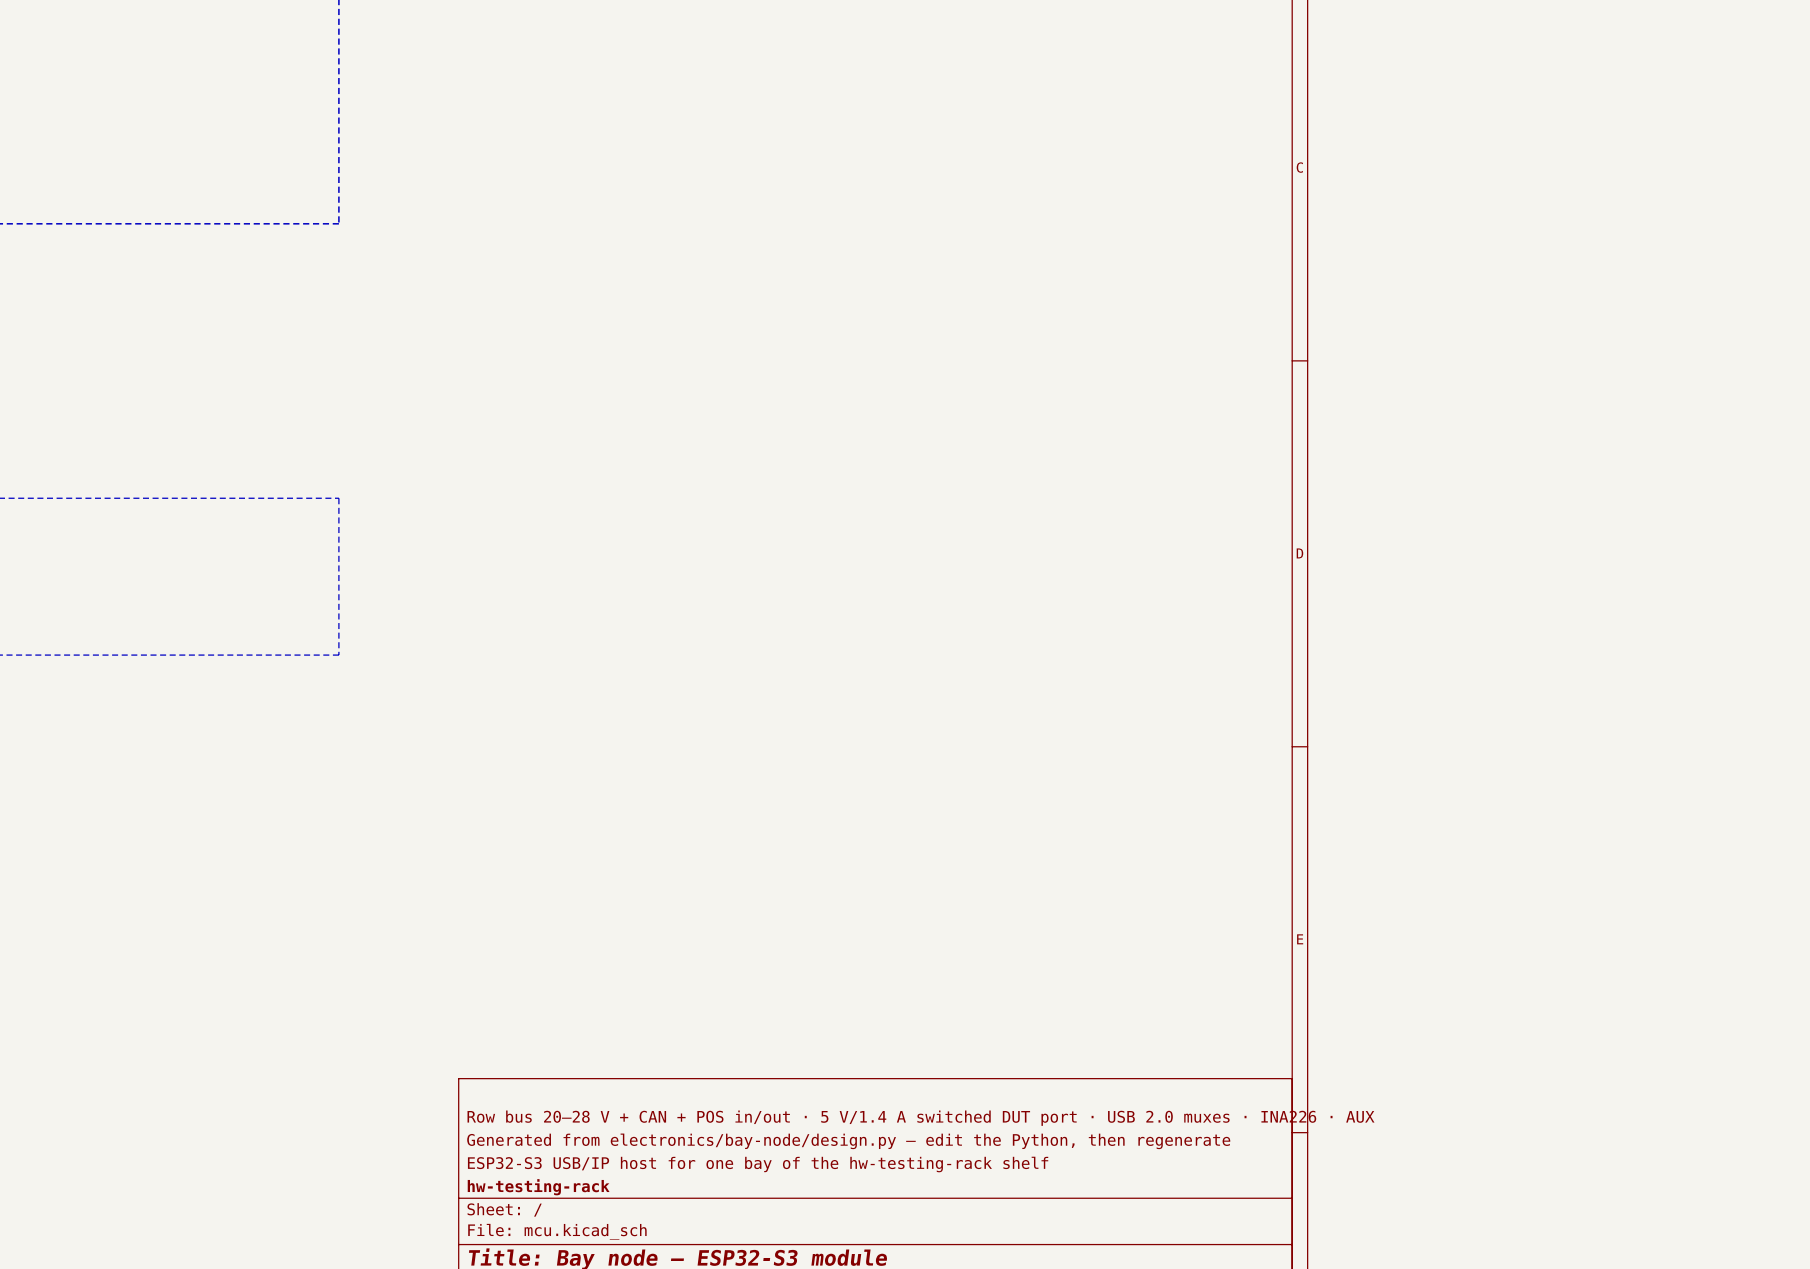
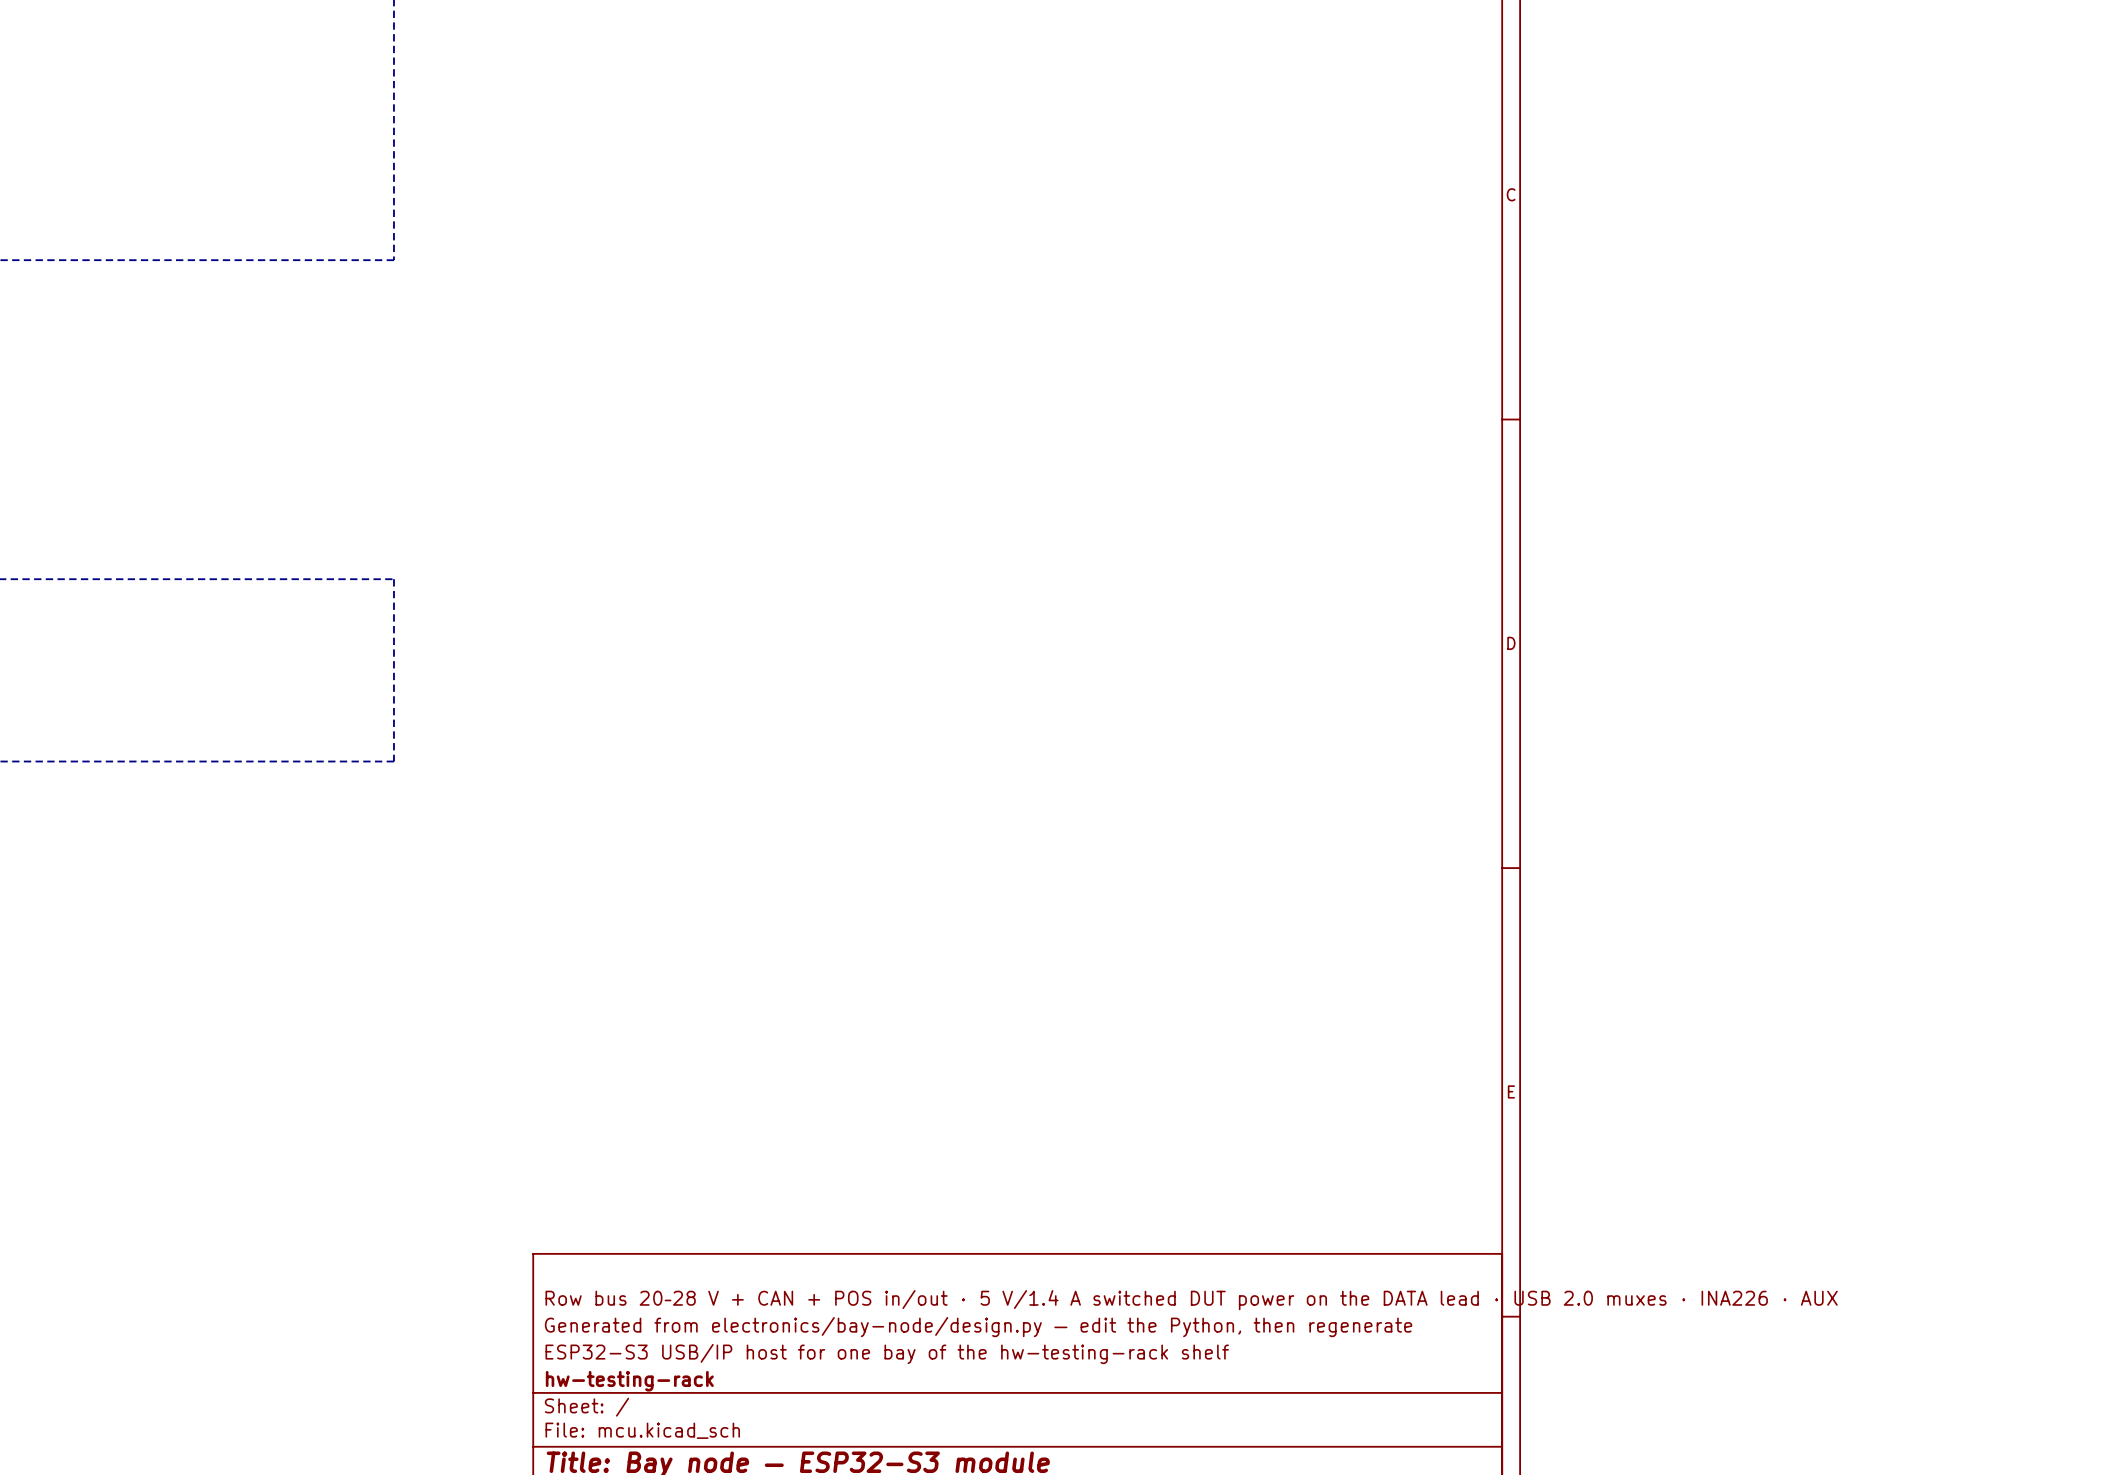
title block: Row bus 20–28 V + CAN + POS in/out · 5 V/1.4 A switched DUT port · USB 2.0 muxes · INA226 · AUX (920, 1118) -> Row bus 20–28 V + CAN + POS in/out · 5 V/1.4 A switched DUT power on the DATA lead · USB 2.0 muxes · INA226 · AUX (1191, 1300)

